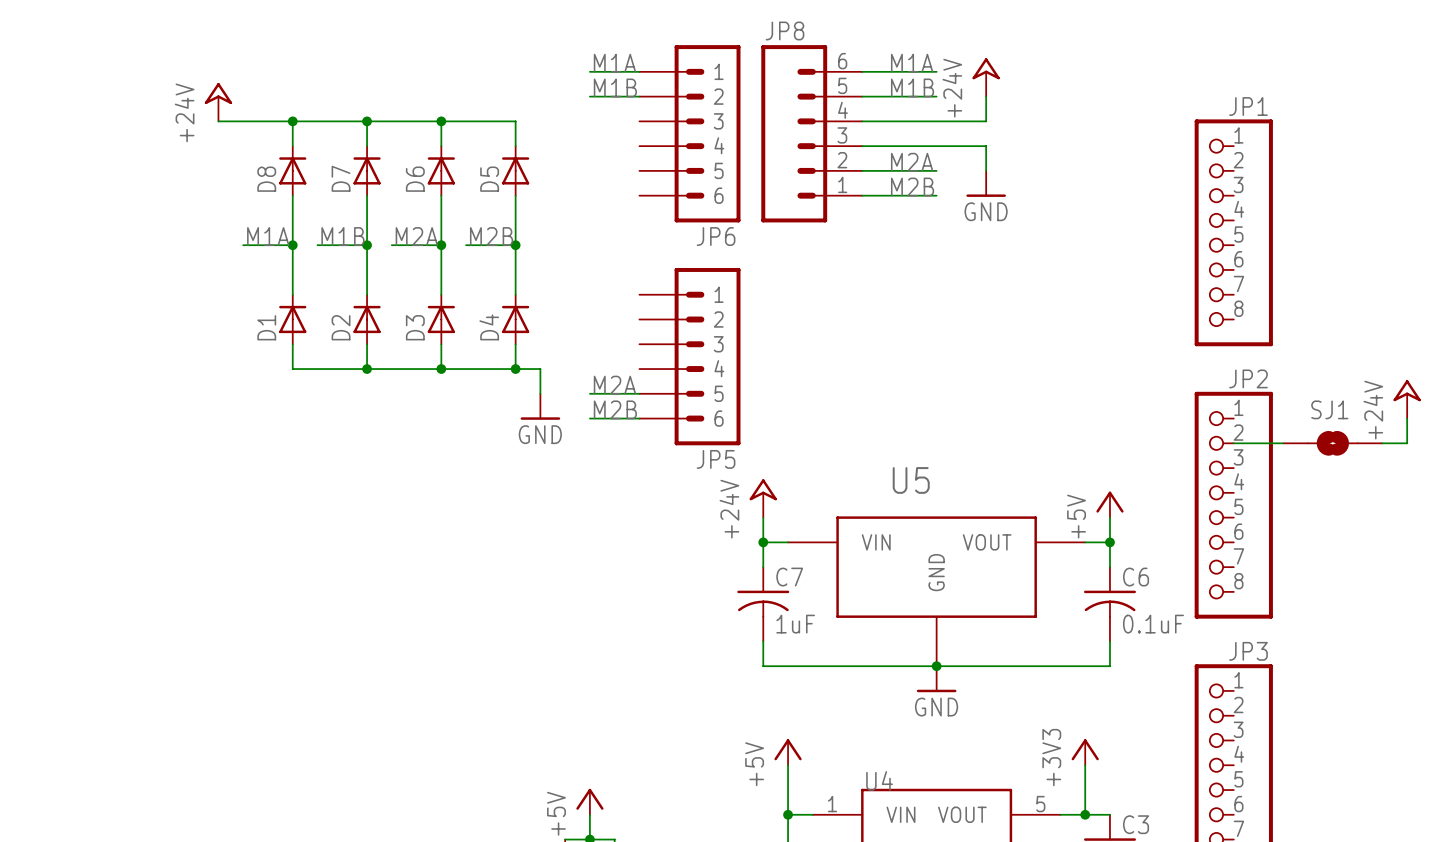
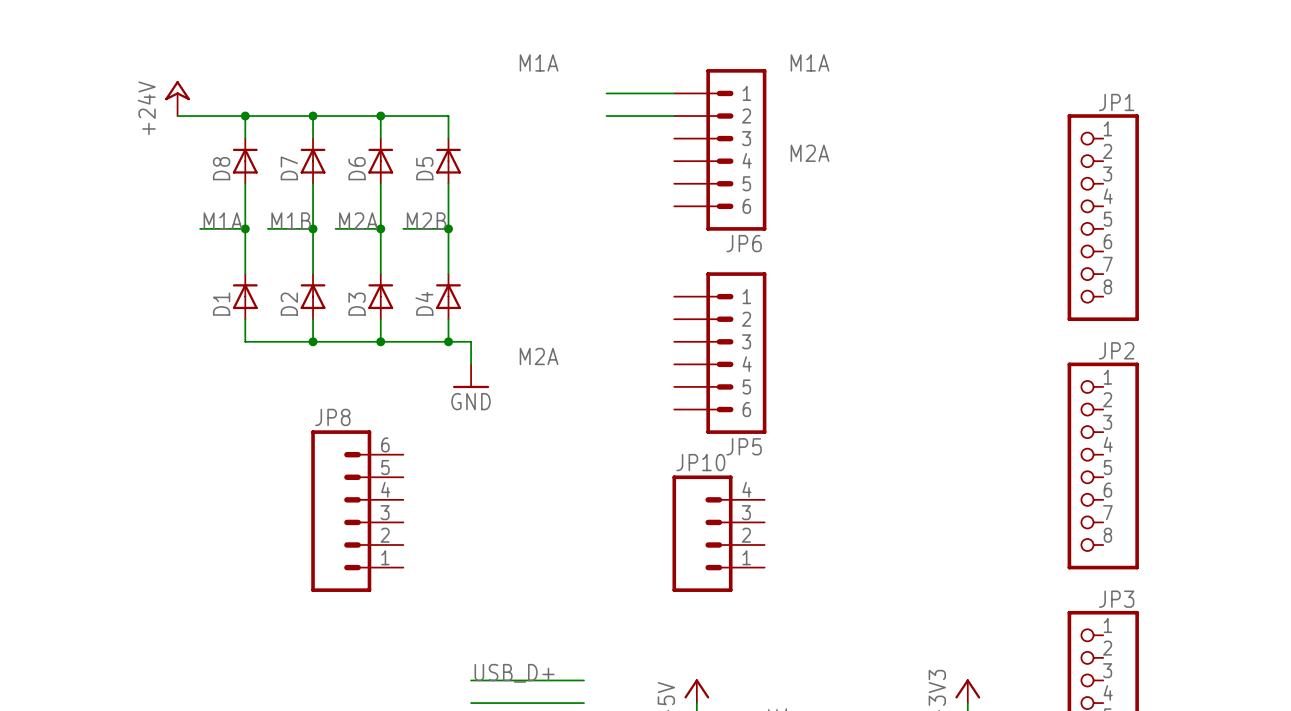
wire: (589, 71) (639, 71) -> none
wire: (862, 71) (936, 71) -> (606, 93) (674, 93)
power symbol: +24V (986, 77) -> none
label: M1B (615, 87) -> none
label: M1B (912, 87) -> none
wire: (589, 96) (639, 96) -> none
wire: (862, 96) (936, 96) -> (606, 116) (674, 116)
wire: (986, 96) (986, 121) (862, 121) -> none
JP6 position: (689, 133) -> (720, 149)
JP8 position: (811, 133) -> (357, 511)
wire: (862, 146) (986, 146) (986, 170) -> none
wire: (862, 170) (936, 170) -> none
power symbol: GND (986, 183) -> none
label: M2B (912, 187) -> none
wire: (862, 195) (936, 195) -> none
JP5 position: (689, 356) -> (720, 353)
wire: (589, 393) (639, 393) -> none
power symbol: +24V (1407, 399) -> none
label: M2B (615, 409) -> none
wire: (589, 418) (639, 418) -> none
wire: (1407, 418) (1407, 443) (1382, 443) -> none
wire: (1233, 443) (1283, 443) -> none
SJ1: (1332, 443) -> none
power symbol: +24V (763, 498) -> none
power symbol: +5V (1109, 504) -> none
wire: (1109, 517) (1109, 567) -> none
wire: (763, 542) (788, 542) -> none
junction: (763, 542) -> none
wire: (1085, 542) (1109, 542) -> none
junction: (1109, 542) -> none
JP10: none -> (718, 533)
U5: (936, 591) -> none
C7: 1uF (763, 604) -> none
C6: 0.1uF (1109, 604) -> none
wire: (763, 641) (763, 666) (1109, 666) (1109, 641) -> none
junction: (936, 666) -> none
power symbol: GND (936, 679) -> none
label: none -> USB_D+ (514, 673)
wire: none -> (471, 680) (583, 680)
wire: none -> (471, 703) (583, 703)

